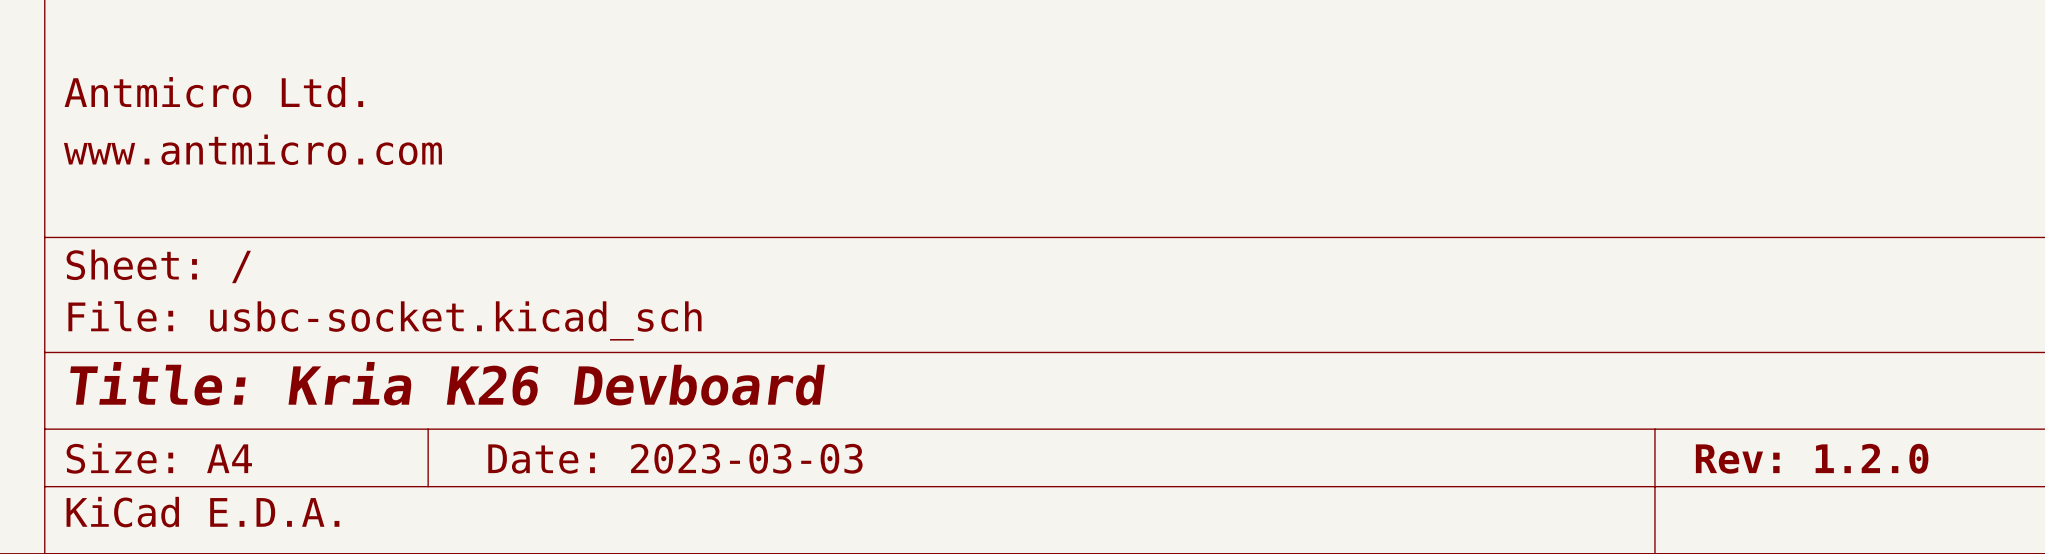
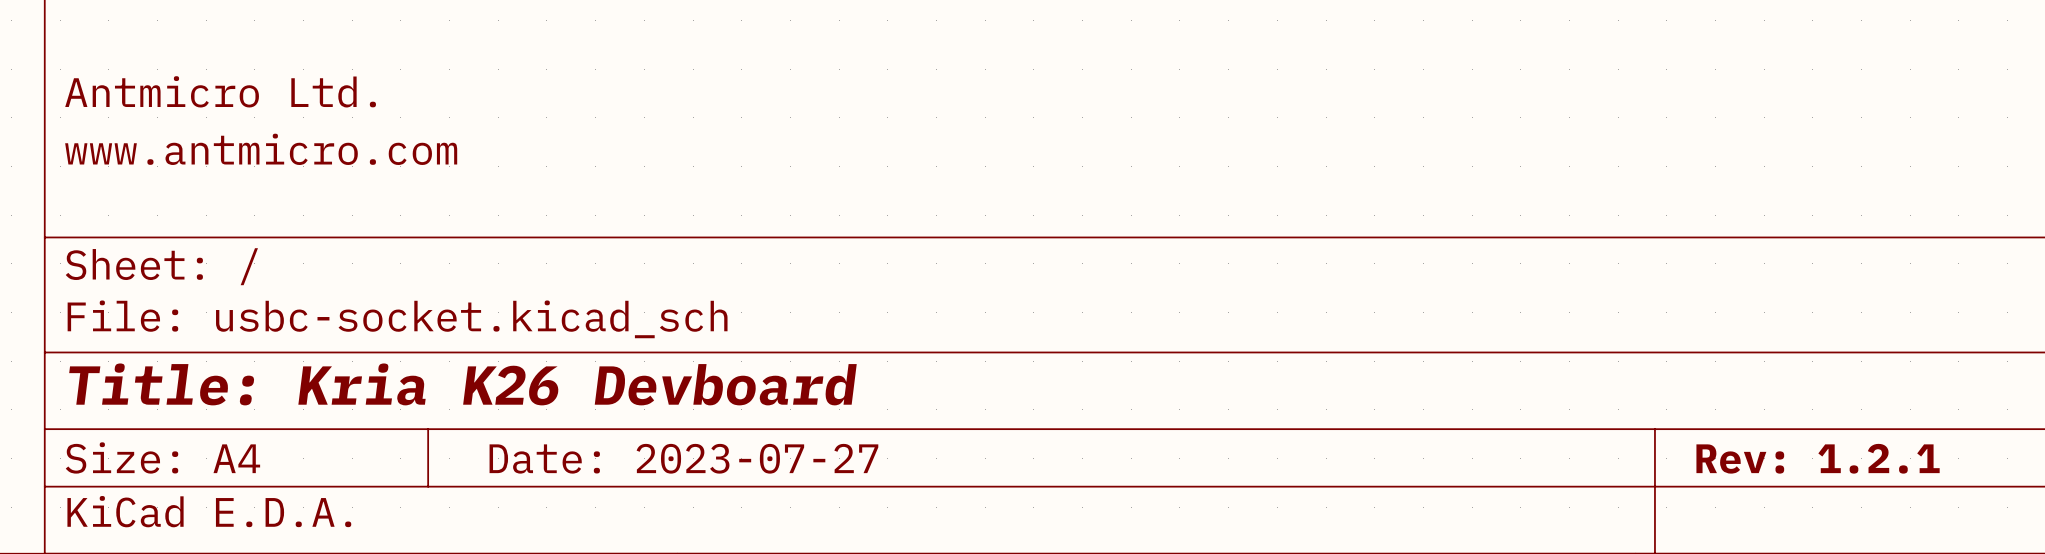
title block: Date: 2023-03-03 (675, 458) -> Date: 2023-07-27 (683, 458)
title block: Rev: 1.2.0 (1812, 458) -> Rev: 1.2.1 (1818, 458)

